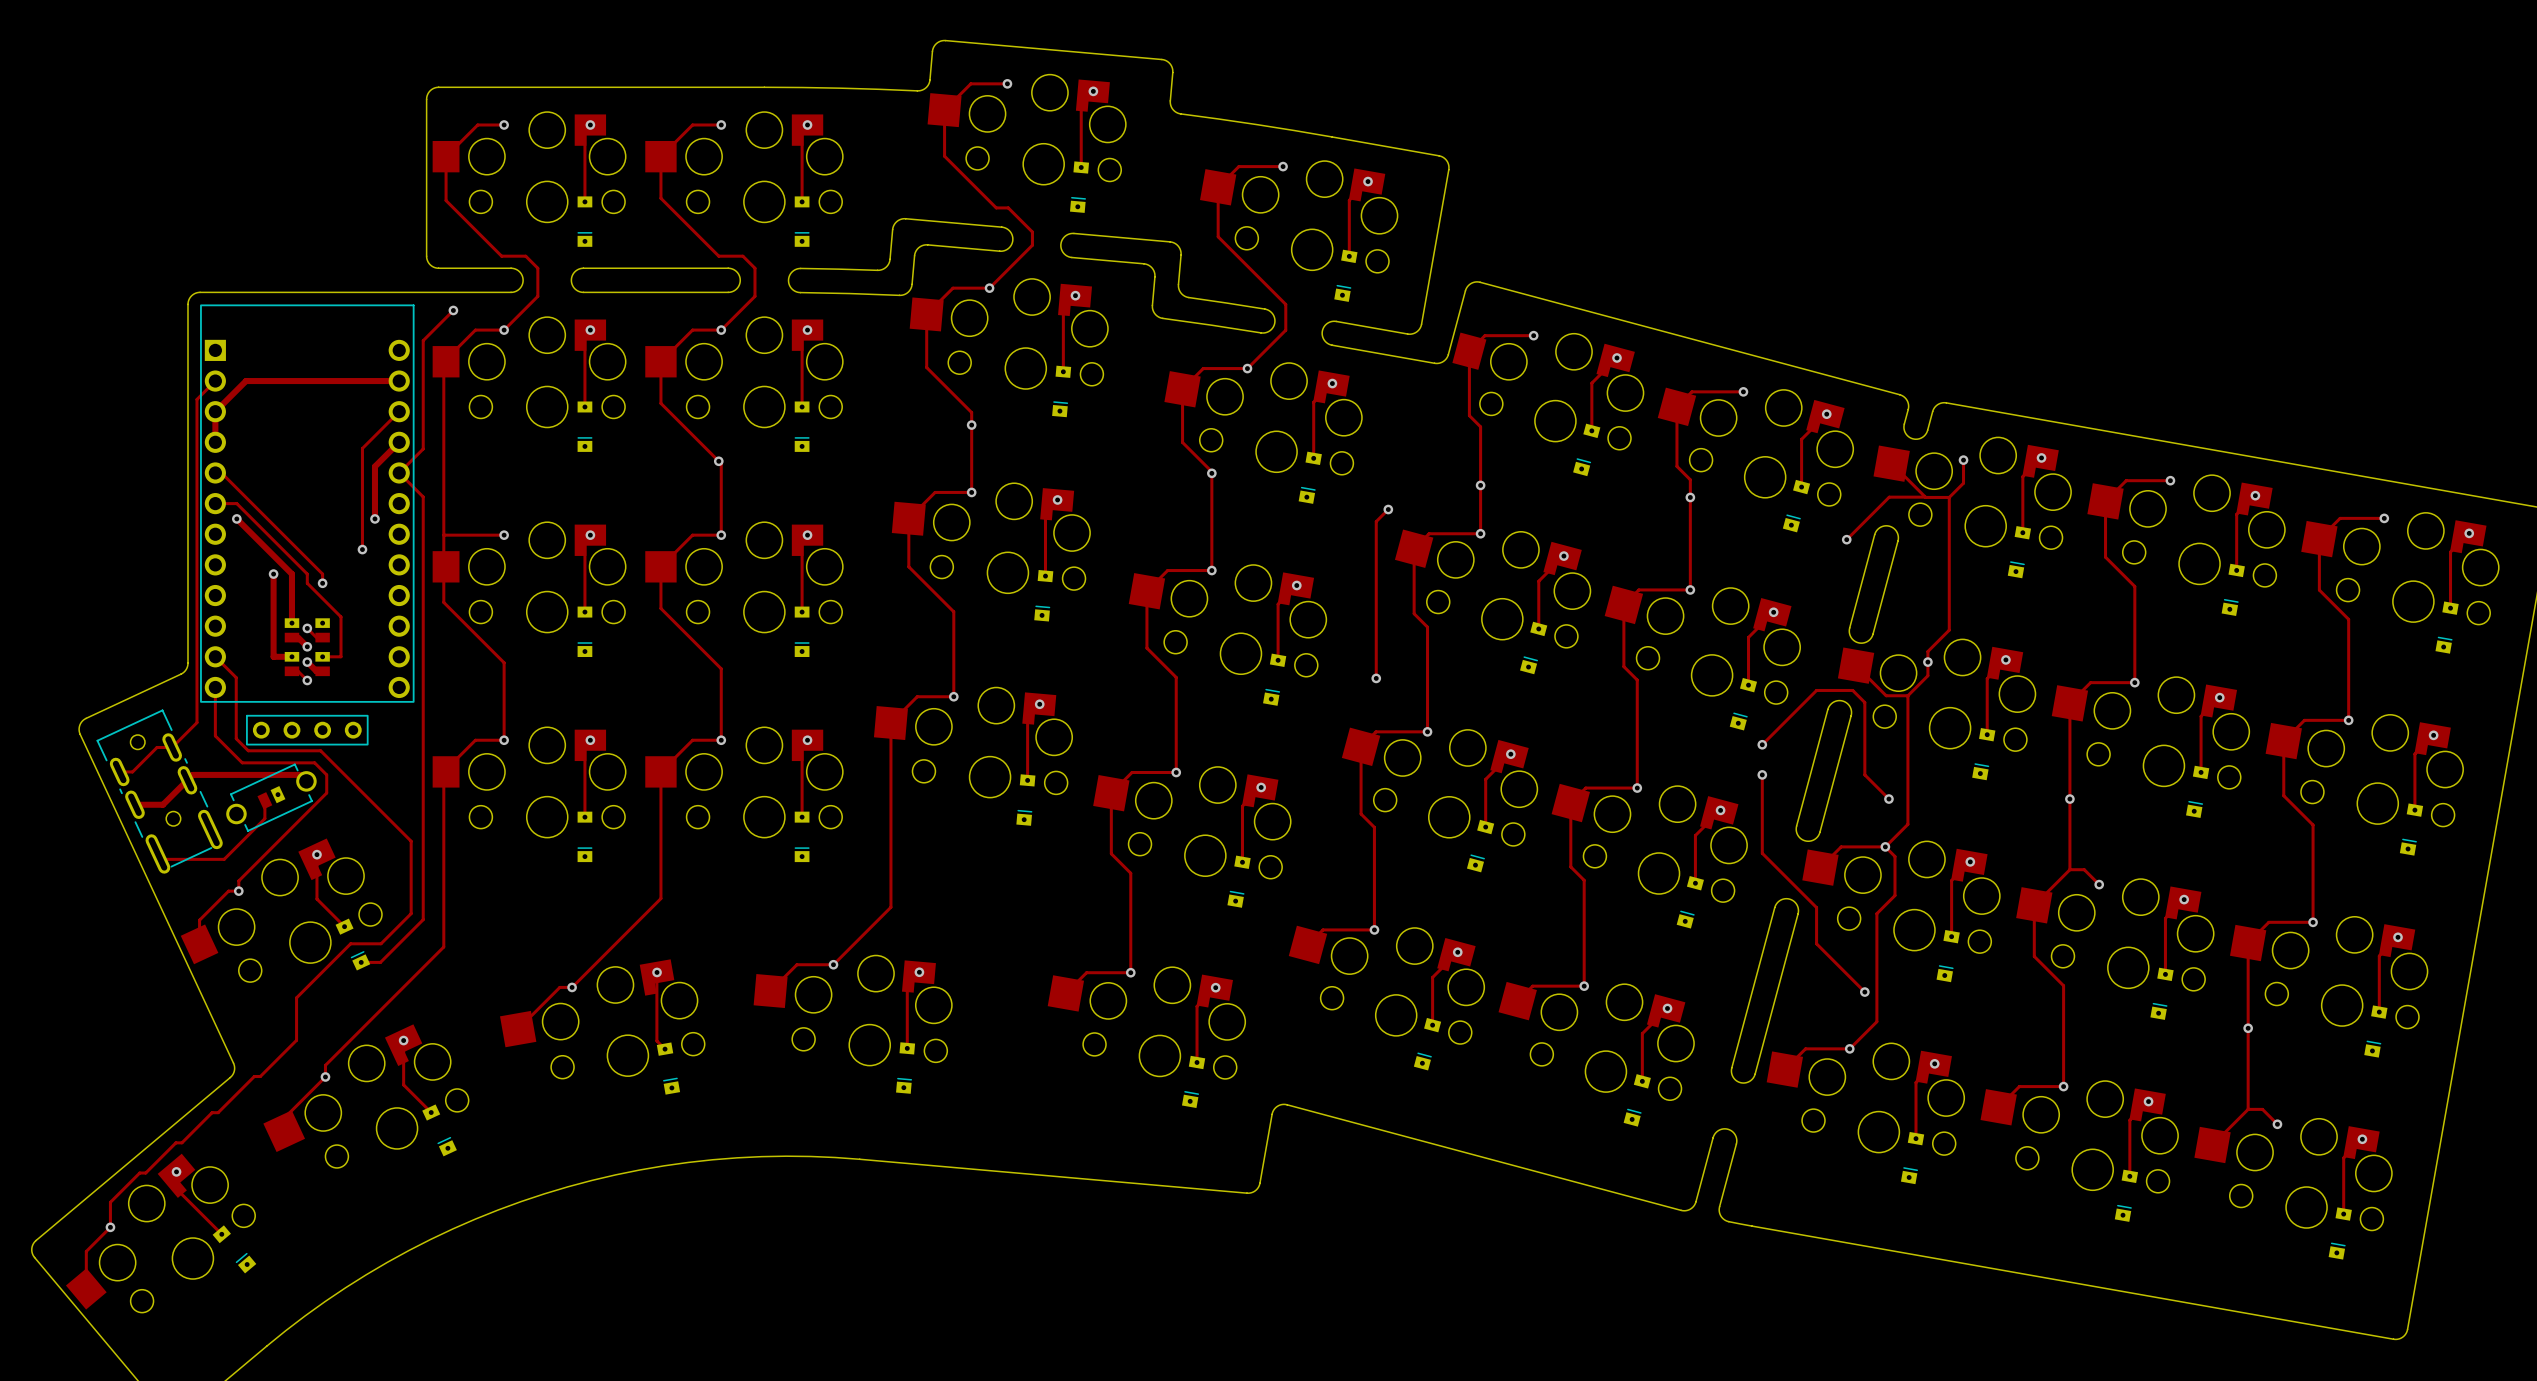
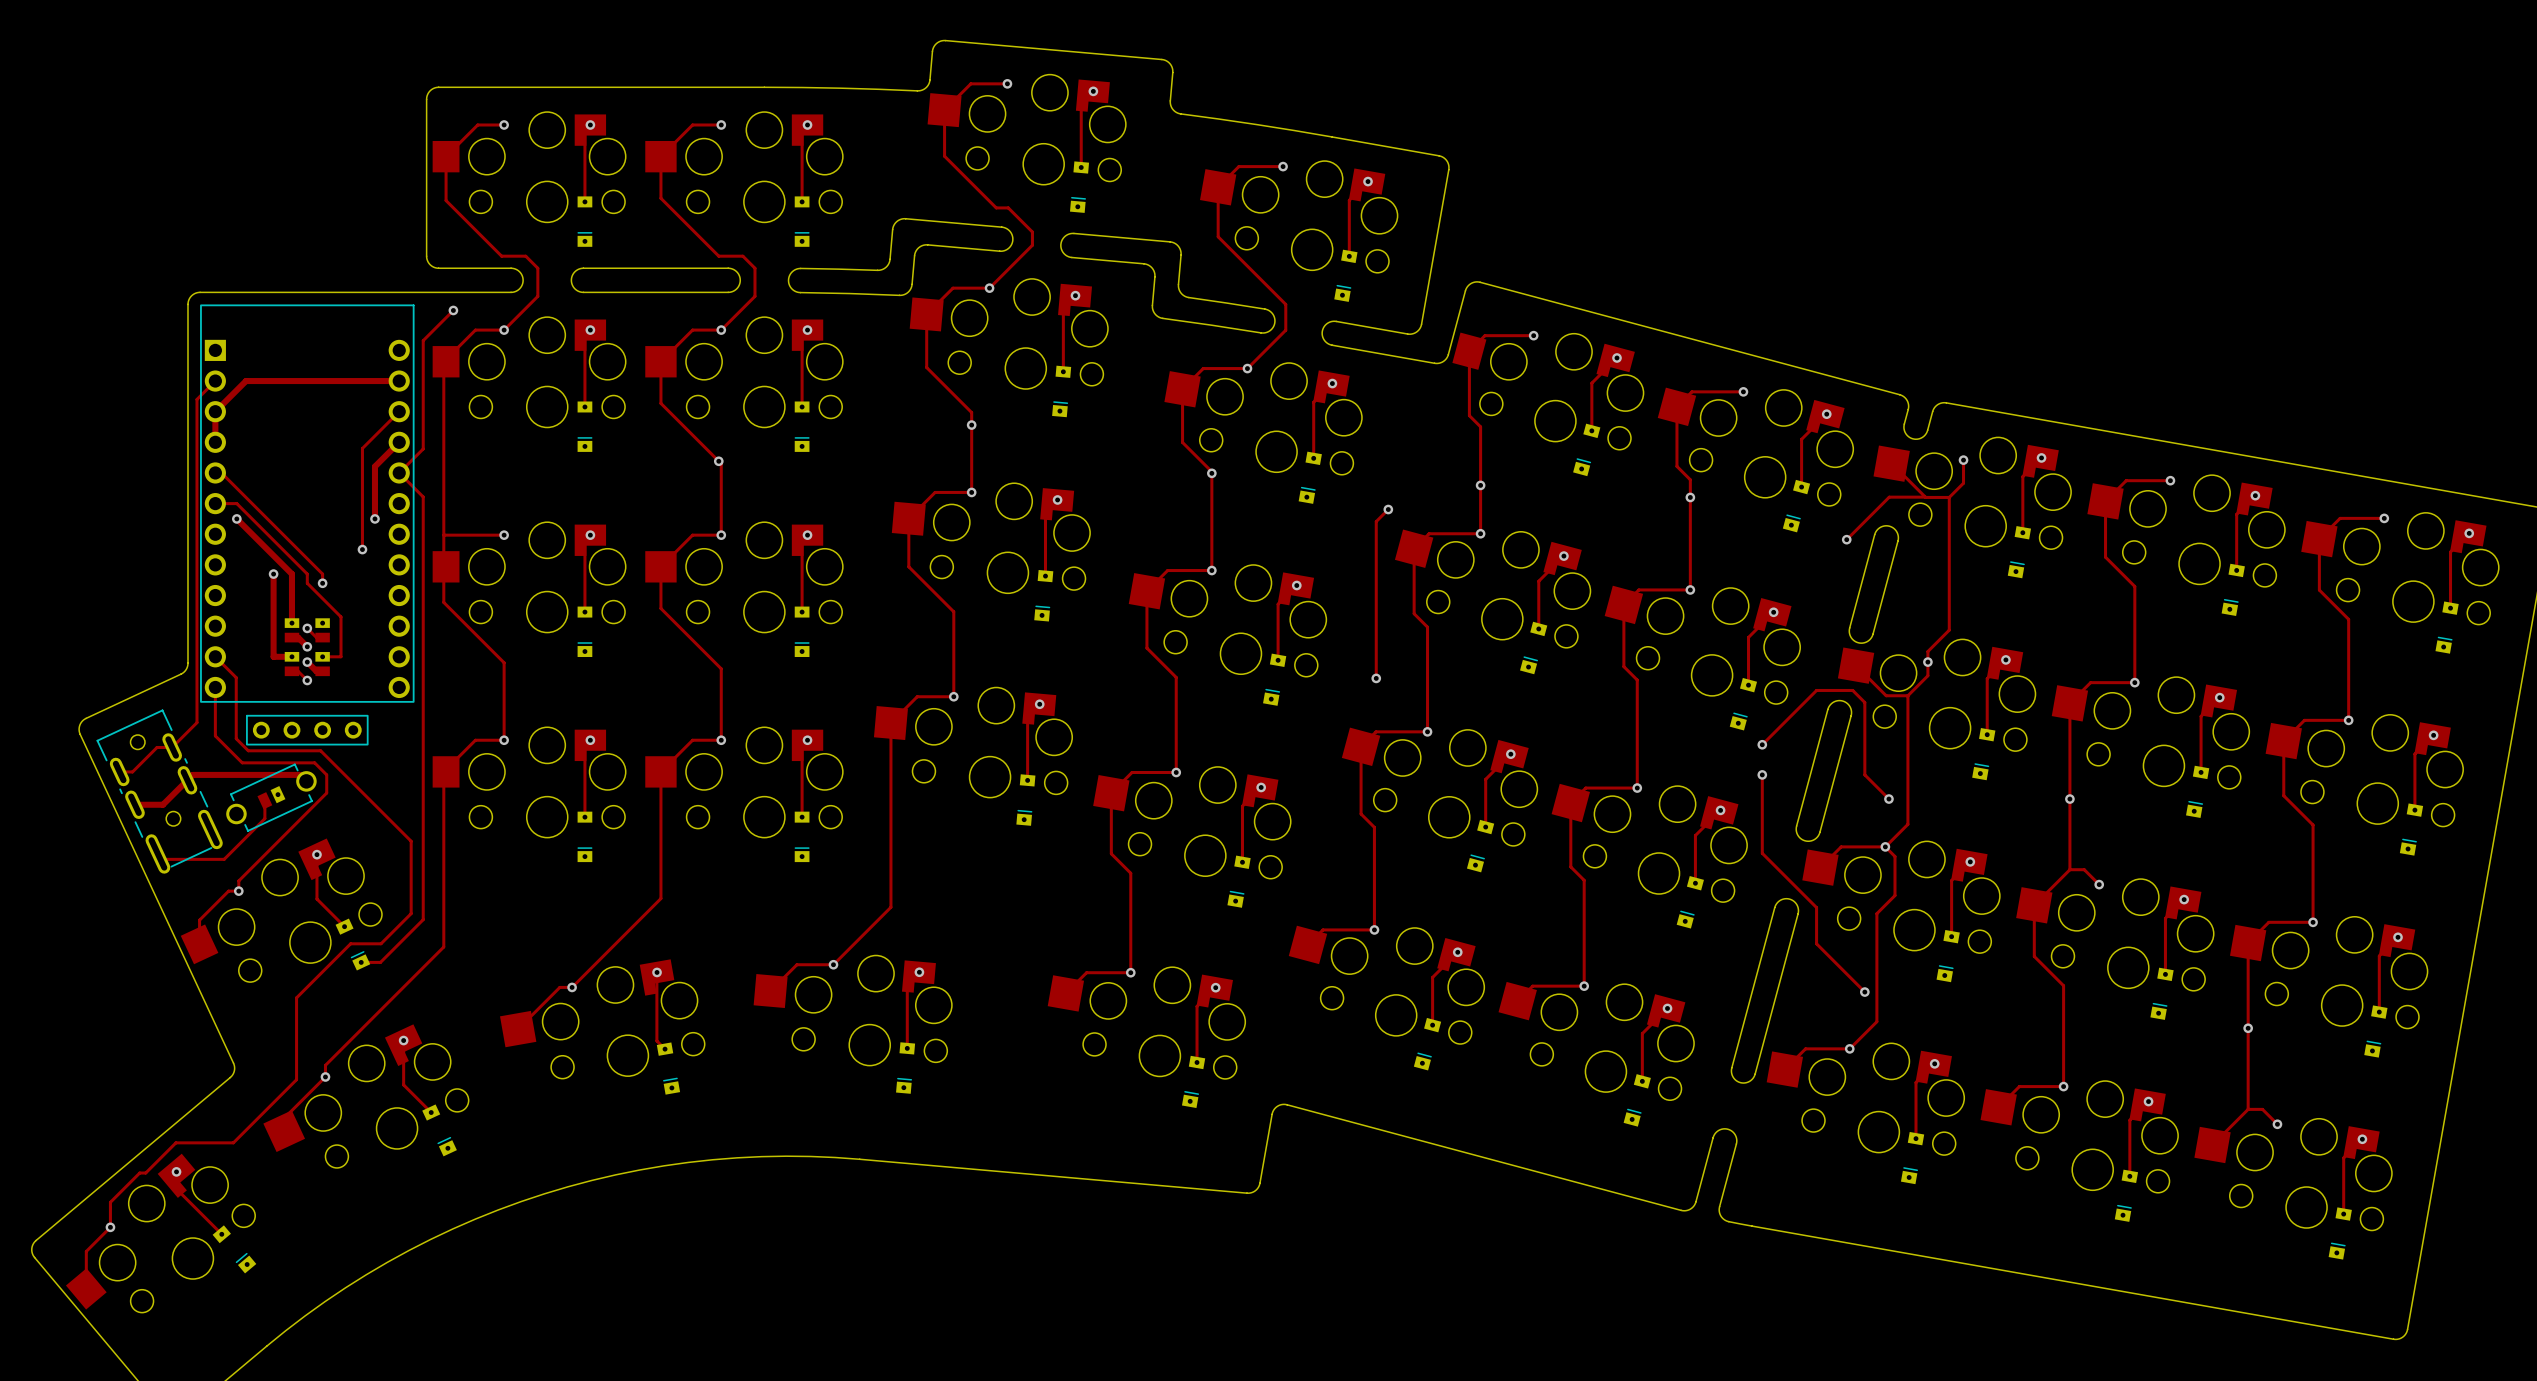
track: (296, 1040) (260, 1076) (254, 1076) (218, 1112) (212, 1112) (181, 1142) -> (296, 1040) (296, 1079) (233, 1142) (181, 1142)

